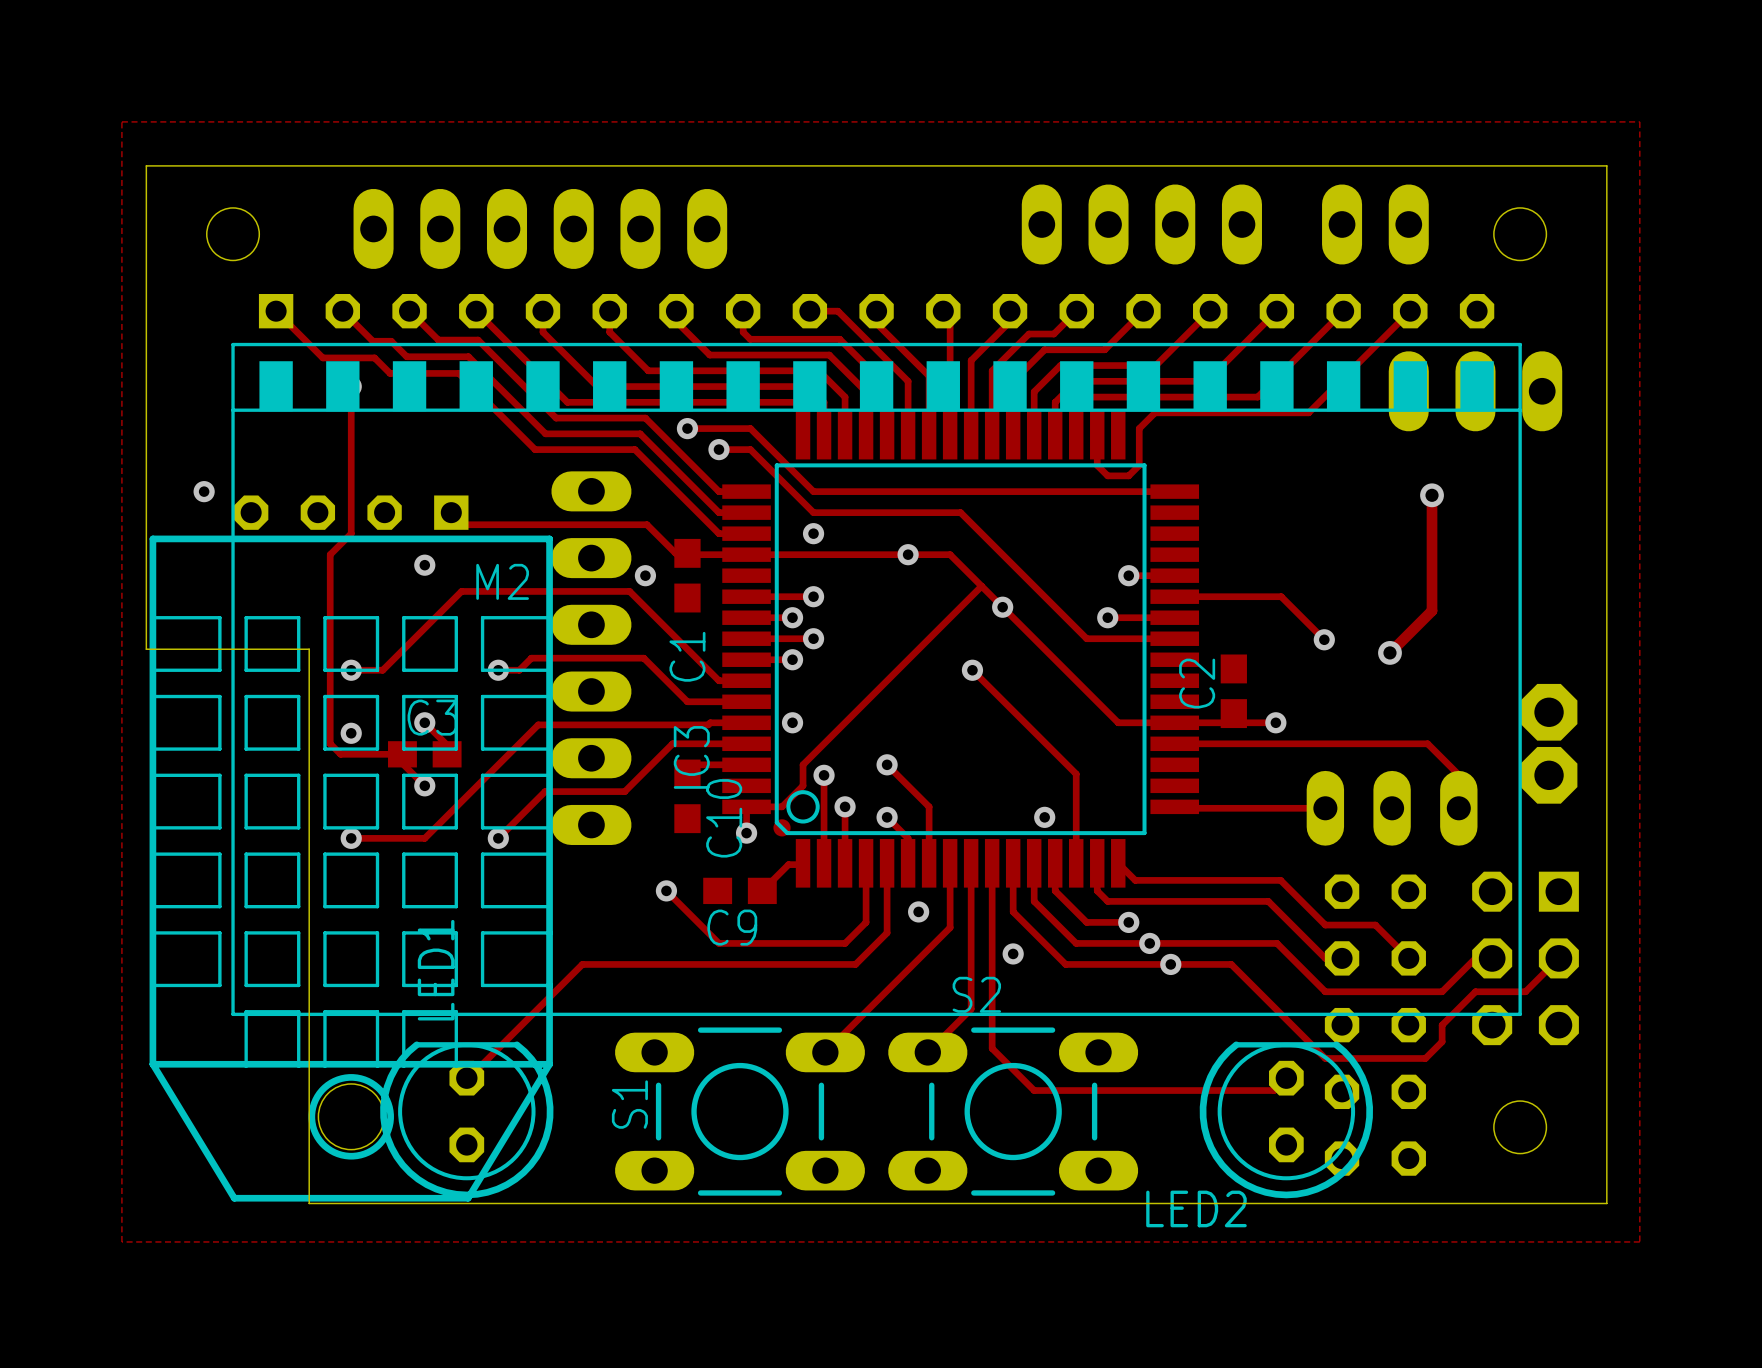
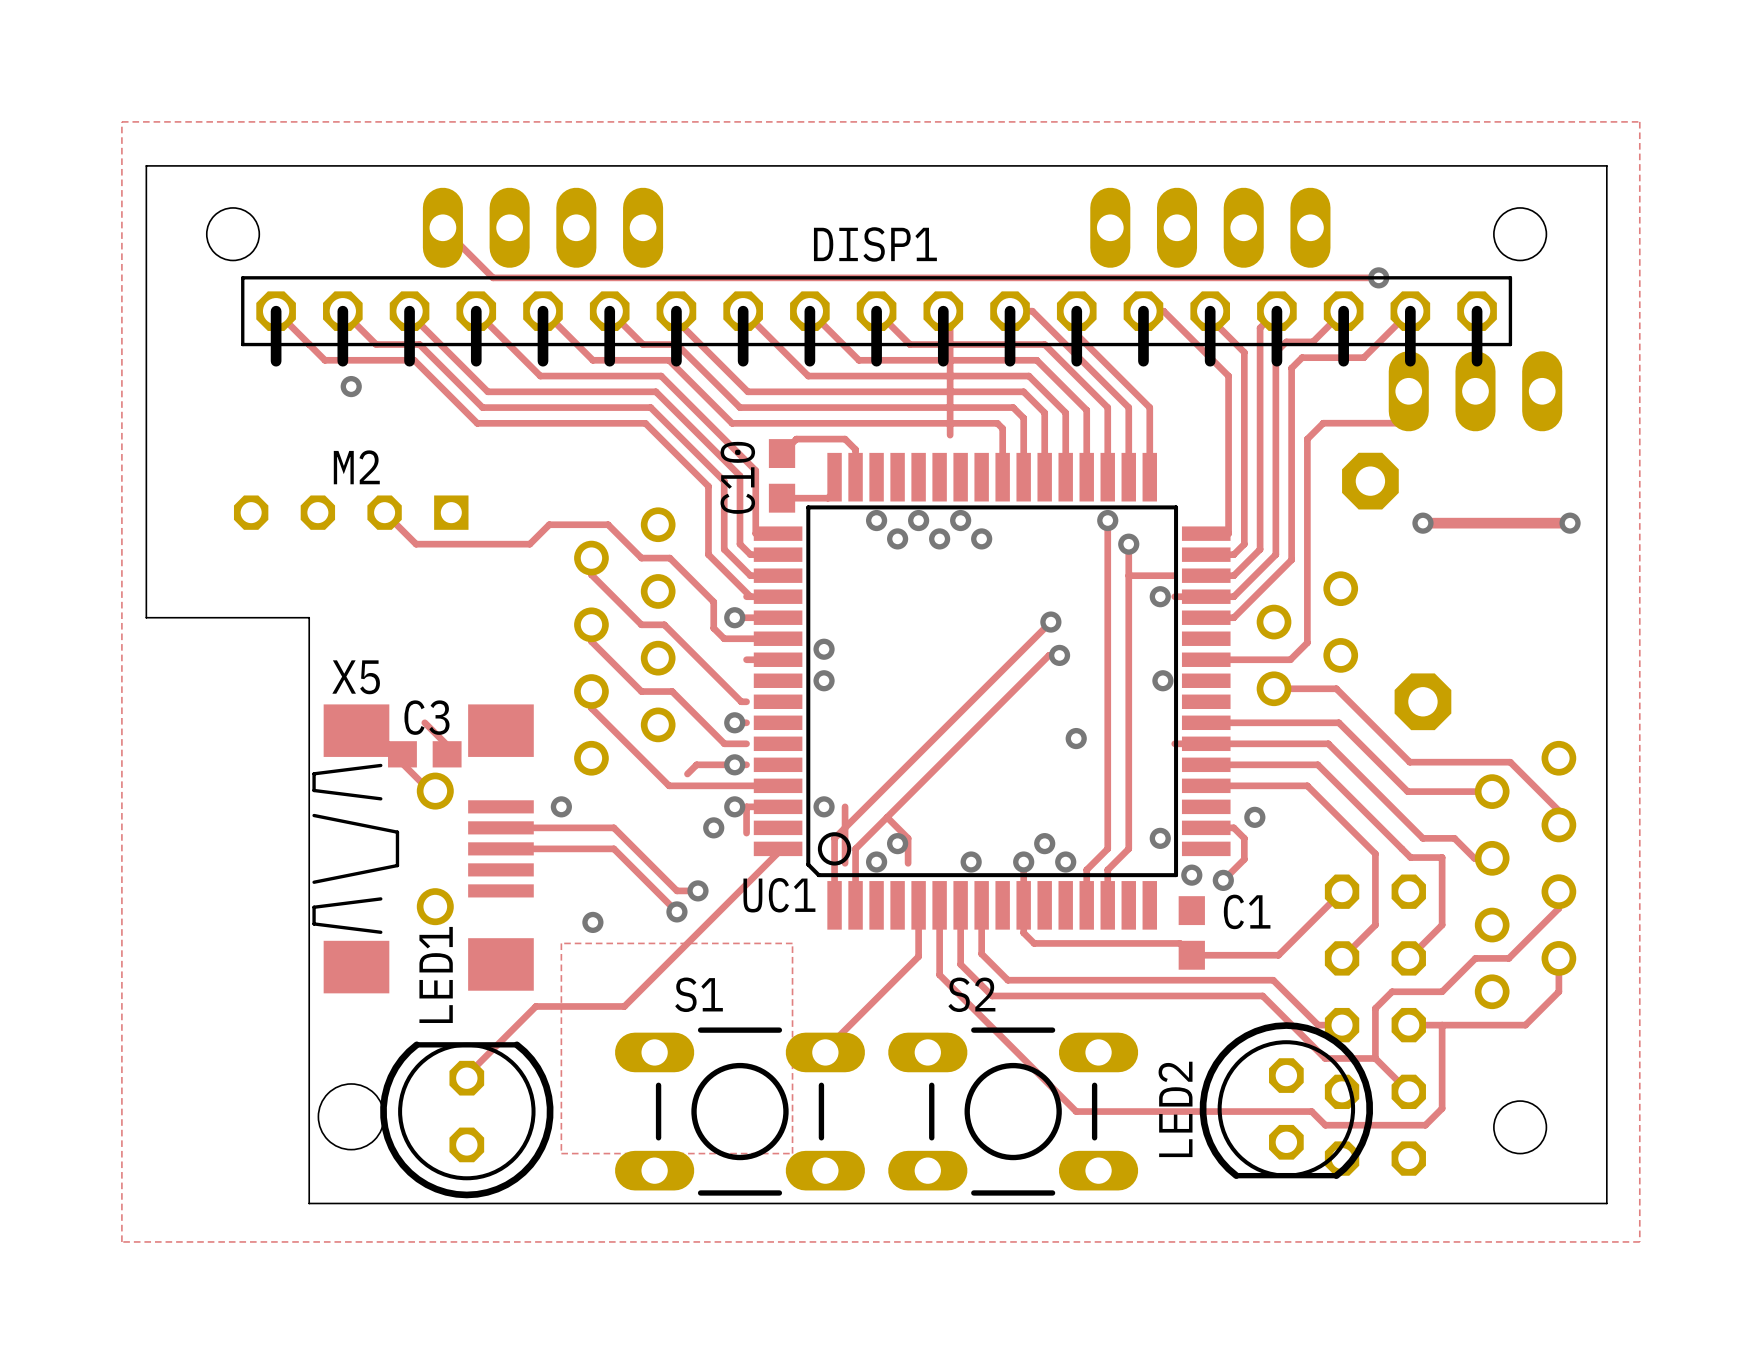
part footprint: [353, 188, 728, 269] -> [422, 187, 664, 268]
part position: (1141, 224) -> (1210, 227)
part: (1375, 224) -> none
track: none -> (442, 227) (493, 277) (1378, 277)
via: none -> (1378, 277)
track: (409, 311) (438, 340) (478, 340) (556, 418) (645, 418) (718, 491) (746, 491) -> (409, 311) (409, 313) (487, 391) (655, 391) (739, 475) (739, 544) (750, 554)
track: (476, 311) (567, 402) (797, 402) (803, 407) (803, 435) -> (476, 311) (540, 376) (661, 376) (755, 470) (755, 533) (778, 533)
track: (542, 311) (542, 332) (597, 386) (808, 386) (824, 402) (824, 435) -> (542, 311) (592, 360) (669, 360) (732, 423) (997, 423) (1002, 428) (1002, 477)
track: (609, 311) (609, 332) (648, 370) (818, 370) (845, 397) (845, 435) -> (609, 311) (643, 344) (676, 344) (739, 407) (1013, 407) (1023, 418) (1023, 477)
track: (743, 311) (743, 332) (750, 339) (839, 339) (887, 386) (887, 435) -> (743, 311) (808, 376) (1028, 376) (1065, 412) (1065, 477)
track: (809, 311) (837, 311) (908, 381) (908, 435) -> (809, 311) (858, 360) (1036, 360) (1086, 410) (1086, 477)
track: (876, 311) (876, 323) (929, 376) (929, 435) -> (876, 311) (909, 344) (1044, 344) (1107, 407) (1107, 477)
track: (1010, 311) (1010, 321) (971, 360) (971, 435) -> (1010, 311) (1032, 311) (1128, 407) (1128, 477)
track: (1076, 311) (1053, 334) (1028, 334) (992, 370) (992, 435) -> (1076, 311) (1076, 334) (1149, 407) (1149, 477)
track: (1143, 311) (1104, 349) (1044, 349) (1013, 381) (1013, 435) -> (1143, 311) (1163, 311) (1228, 376) (1228, 533) (1206, 533)
track: (1210, 311) (1155, 365) (1060, 365) (1034, 391) (1034, 435) -> (1210, 311) (1210, 318) (1244, 352) (1244, 544) (1233, 554) (1206, 554)
track: (676, 320) (709, 355) (829, 355) (866, 391) (866, 435) -> (676, 320) (747, 391) (1023, 391) (1044, 412) (1044, 477)
DISP1: none -> (876, 321)
track: (1260, 327) (1206, 381) (1076, 381) (1055, 402) (1055, 435) -> (1260, 327) (1260, 549) (1233, 575) (1206, 575)
track: (372, 341) (391, 341) (406, 356) (468, 356) (545, 433) (640, 433) (718, 512) (746, 512) -> (372, 341) (376, 344) (419, 344) (482, 407) (650, 407) (724, 481) (724, 549) (750, 575) (778, 575)
track: (1312, 341) (1257, 397) (1086, 397) (1076, 407) (1076, 435) -> (1312, 341) (1286, 341) (1275, 352) (1275, 554) (1233, 596)
track: (309, 344) (322, 357) (374, 357) (390, 373) (458, 373) (535, 449) (634, 449) (718, 533) (746, 533) -> (309, 344) (324, 360) (414, 360) (477, 423) (645, 423) (708, 486) (708, 554) (750, 596)
track: (1363, 357) (1308, 412) (1155, 412) (1139, 428) (1139, 465) (1128, 475) (1107, 475) (1097, 465) (1097, 435) -> (1363, 357) (1302, 357) (1291, 368) (1291, 559) (1233, 617) (1206, 617)
track: (351, 386) (351, 533) (330, 554) (330, 743) (340, 754) (402, 754) -> none
track: none -> (1402, 423) (1323, 423) (1307, 439) (1307, 642) (1290, 659) (1206, 659)
track: (687, 428) (750, 428) (813, 491) (1174, 491) -> none
via: (687, 428) -> none
track: (718, 449) (750, 449) (813, 512) (960, 512) (1086, 638) (1174, 638) -> none
via: (718, 449) -> none
track: none -> (782, 453) (796, 439) (845, 439) (855, 449) (855, 477)
track: none -> (834, 477) (834, 491) (827, 498) (782, 498)
part: none -> (1370, 481)
via: (204, 491) -> none
M2 footprint: [149, 495, 553, 1202] -> [233, 495, 469, 530]
track: (1432, 495) (1432, 610) (1389, 652) -> none
via: (1432, 495) -> none
track: (451, 512) (463, 524) (549, 524) -> (384, 512) (416, 544) (529, 544) (549, 524)
via: none -> (876, 520)
via: none -> (918, 520)
via: none -> (960, 520)
track: none -> (1107, 520) (1107, 848) (1086, 869) (1086, 905)
via: none -> (1107, 520)
track: none -> (1422, 523) (1570, 523)
via: none -> (1422, 523)
via: none -> (1570, 523)
track: (608, 524) (647, 524) (675, 553) (750, 554) -> (608, 524) (641, 558) (669, 558) (713, 601) (713, 628) (724, 638) (746, 638)
via: (813, 533) -> none
via: none -> (939, 538)
via: none -> (981, 538)
track: none -> (1128, 544) (1128, 848) (1107, 869) (1107, 905)
via: none -> (1128, 544)
track: (778, 554) (950, 554) (1118, 722) (1206, 722) -> none
via position: (908, 554) -> (897, 538)
via: (424, 565) -> none
via: (645, 575) -> none
C1 position: (687, 575) -> (1191, 932)
via: (1128, 575) -> none
M2 name position: M2 (502, 581) -> M2 (356, 467)
track: (981, 586) (803, 764) (803, 785) (782, 806) (778, 806) -> none
track: (778, 596) (813, 596) -> none
via: (813, 596) -> none
via: none -> (1160, 596)
track: (1233, 596) (1281, 596) (1324, 639) -> none
via: (1002, 607) -> none
board edge: (146, 617) (146, 649) (309, 649) -> (146, 617) (309, 617) (309, 649)
via: none -> (734, 617)
via: (792, 617) -> none
track: (1107, 617) (1174, 617) -> none
via: (1107, 617) -> none
track: none -> (1050, 622) (834, 838) (834, 905)
via: none -> (1050, 622)
track: (778, 638) (813, 638) -> none
via position: (813, 638) -> (824, 649)
part: none -> (1307, 638)
via: (1324, 639) -> none
part: none -> (624, 641)
IC3: (960, 649) -> none
via: (1389, 652) -> none
part: (876, 655) -> none
track: none -> (1059, 655) (1049, 655) (855, 848) (855, 905)
via: none -> (1059, 655)
C1 name rotation: 0° (687, 656) -> 90° clockwise (1247, 911)
C1 name position: C1 (687, 656) -> C1 (1247, 911)
part: (591, 658) -> none
via: (792, 659) -> none
track: (351, 670) (382, 670) (461, 591) (629, 591) (718, 680) (746, 680) -> none
via: (351, 670) -> none
track: (498, 670) (519, 670) (531, 658) (643, 658) (687, 701) (741, 701) -> (591, 558) (591, 574) (641, 624) (664, 624) (741, 701)
via: (498, 670) -> none
track: (972, 670) (1076, 774) (1076, 863) -> none
via: (972, 670) -> none
via: none -> (824, 680)
via: none -> (1162, 680)
track: none -> (1274, 688) (1336, 688) (1409, 762) (1510, 762) (1558, 810) (1558, 824)
track: none -> (591, 691) (591, 708) (669, 785) (778, 785)
UC1: none -> (992, 691)
C2: (1233, 691) -> none
part: none -> (1422, 701)
part: (1549, 712) -> none
via: (424, 722) -> none
track: (734, 722) (710, 722) (708, 724) (538, 724) (424, 838) (351, 838) -> none
via: none -> (734, 722)
via: (792, 722) -> none
track: none -> (1275, 722) (1338, 722) (1407, 791) (1492, 791)
via: (1275, 722) -> none
via: (351, 733) -> none
via: none -> (1076, 738)
track: (724, 743) (672, 743) (624, 791) (545, 791) (498, 838) -> (724, 743) (672, 691) (641, 691) (591, 641) (591, 624)
track: (1328, 743) (1427, 743) (1458, 774) (1458, 808) -> (1328, 743) (1422, 838) (1454, 838) (1474, 858) (1492, 858)
via: none -> (734, 764)
track: (887, 764) (929, 806) (929, 863) -> none
via: (887, 764) -> none
track: (824, 775) (824, 863) -> none
via: (824, 775) -> none
part: (1549, 775) -> none
via: (424, 785) -> none
C10 position: (687, 796) -> (782, 475)
via: none -> (561, 806)
via: none -> (734, 806)
via position: (845, 806) -> (824, 806)
track: (1174, 806) (1325, 808) -> none
part: (1392, 808) -> none
via: (887, 817) -> none
via: (1044, 817) -> none
via: none -> (1254, 817)
C10 name position: C10 (724, 818) -> C10 (737, 477)
drawing: [773, 819, 791, 837] -> none
track: none -> (500, 827) (613, 827) (676, 890) (697, 890)
via: none -> (713, 827)
track: none -> (1206, 827) (1233, 827) (1244, 838) (1244, 859) (1223, 880)
via: (746, 833) -> none
via: (351, 838) -> none
via: (498, 838) -> none
via: none -> (1160, 838)
via: none -> (897, 843)
via: none -> (1044, 843)
X5: none -> (423, 848)
track: none -> (500, 848) (613, 848) (676, 911)
track: none -> (778, 848) (778, 852) (624, 1006) (535, 1006) (466, 1075)
via: none -> (876, 862)
via: none -> (971, 862)
via: none -> (1023, 862)
via: none -> (1065, 862)
track: (803, 863) (788, 864) (762, 890) -> none
track: (866, 863) (866, 922) (845, 943) (718, 943) (666, 890) -> none
track: (887, 863) (887, 932) (855, 964) (582, 964) (466, 1078) -> none
track: (950, 863) (950, 927) (825, 1052) -> none
track: (971, 863) (971, 1009) (927, 1052) -> none
track: (992, 863) (992, 1048) (1034, 1090) (1274, 1090) (1286, 1078) -> none
track: (1013, 863) (1013, 911) (1065, 964) (1231, 964) (1325, 1058) -> (960, 905) (960, 964) (992, 995) (1262, 995) (1325, 1058)
track: (1034, 863) (1034, 901) (1076, 943) -> (1023, 862) (1023, 932) (1034, 943) (1076, 943)
track: (1055, 863) (1055, 890) (1086, 922) (1128, 922) -> none
track: (1097, 863) (1097, 890) (1107, 901) (1268, 901) (1325, 958) (1342, 958) -> (1206, 785) (1307, 785) (1375, 853) (1375, 925) (1342, 958)
track: (1118, 863) (1135, 880) (1280, 880) (1325, 925) (1375, 925) (1408, 958) -> (1206, 764) (1317, 764) (1410, 857) (1442, 857) (1442, 925) (1408, 958)
via: none -> (1191, 875)
part: none -> (1525, 875)
via: none -> (1223, 880)
via position: (666, 890) -> (676, 911)
via: none -> (697, 890)
C9: (739, 890) -> none
track: none -> (1558, 891) (1558, 908) (1508, 958) (1492, 958)
track: none -> (918, 905) (918, 956) (825, 1049)
track: none -> (981, 905) (981, 953) (1007, 980) (1273, 980) (1318, 1025) (1342, 1025)
via: (918, 911) -> none
via: none -> (592, 922)
via: (1128, 922) -> none
zone outline: none -> (561, 943) (561, 1153) (792, 1153) (792, 943) (561, 943)
via: (1149, 943) -> none
track: (1179, 943) (1277, 943) (1325, 991) (1392, 991) -> (1179, 943) (1191, 955) (1278, 955) (1342, 891)
via: (1013, 953) -> none
part: (1525, 958) -> none
track: (1558, 958) (1525, 991) (1475, 991) (1442, 1025) -> (1558, 958) (1558, 991) (1525, 1025) (1408, 1025)
via: (1170, 964) -> none
track: none -> (1392, 991) (1375, 1008) (1375, 1058) (1408, 1091)
track: (1442, 1041) (1425, 1058) (1375, 1058) -> (1442, 1041) (1442, 1108) (1425, 1125) (1325, 1125) (1311, 1111) (1076, 1111) (939, 974) (939, 905)
S1 name rotation: 0° (629, 1104) -> 90° clockwise (699, 994)
S1 name position: S1 (629, 1104) -> S1 (699, 994)
LED2 rotation: 0° (1286, 1119) -> 180° (1286, 1100)
LED2 name position: LED2 (1196, 1208) -> LED2 (1175, 1109)

